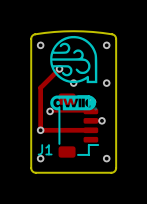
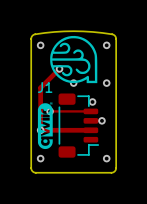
drawing: [50, 95, 98, 111] -> none
drawing: none -> [37, 102, 53, 150]
J1 name position: J1 (45, 149) -> J1 (45, 87)

